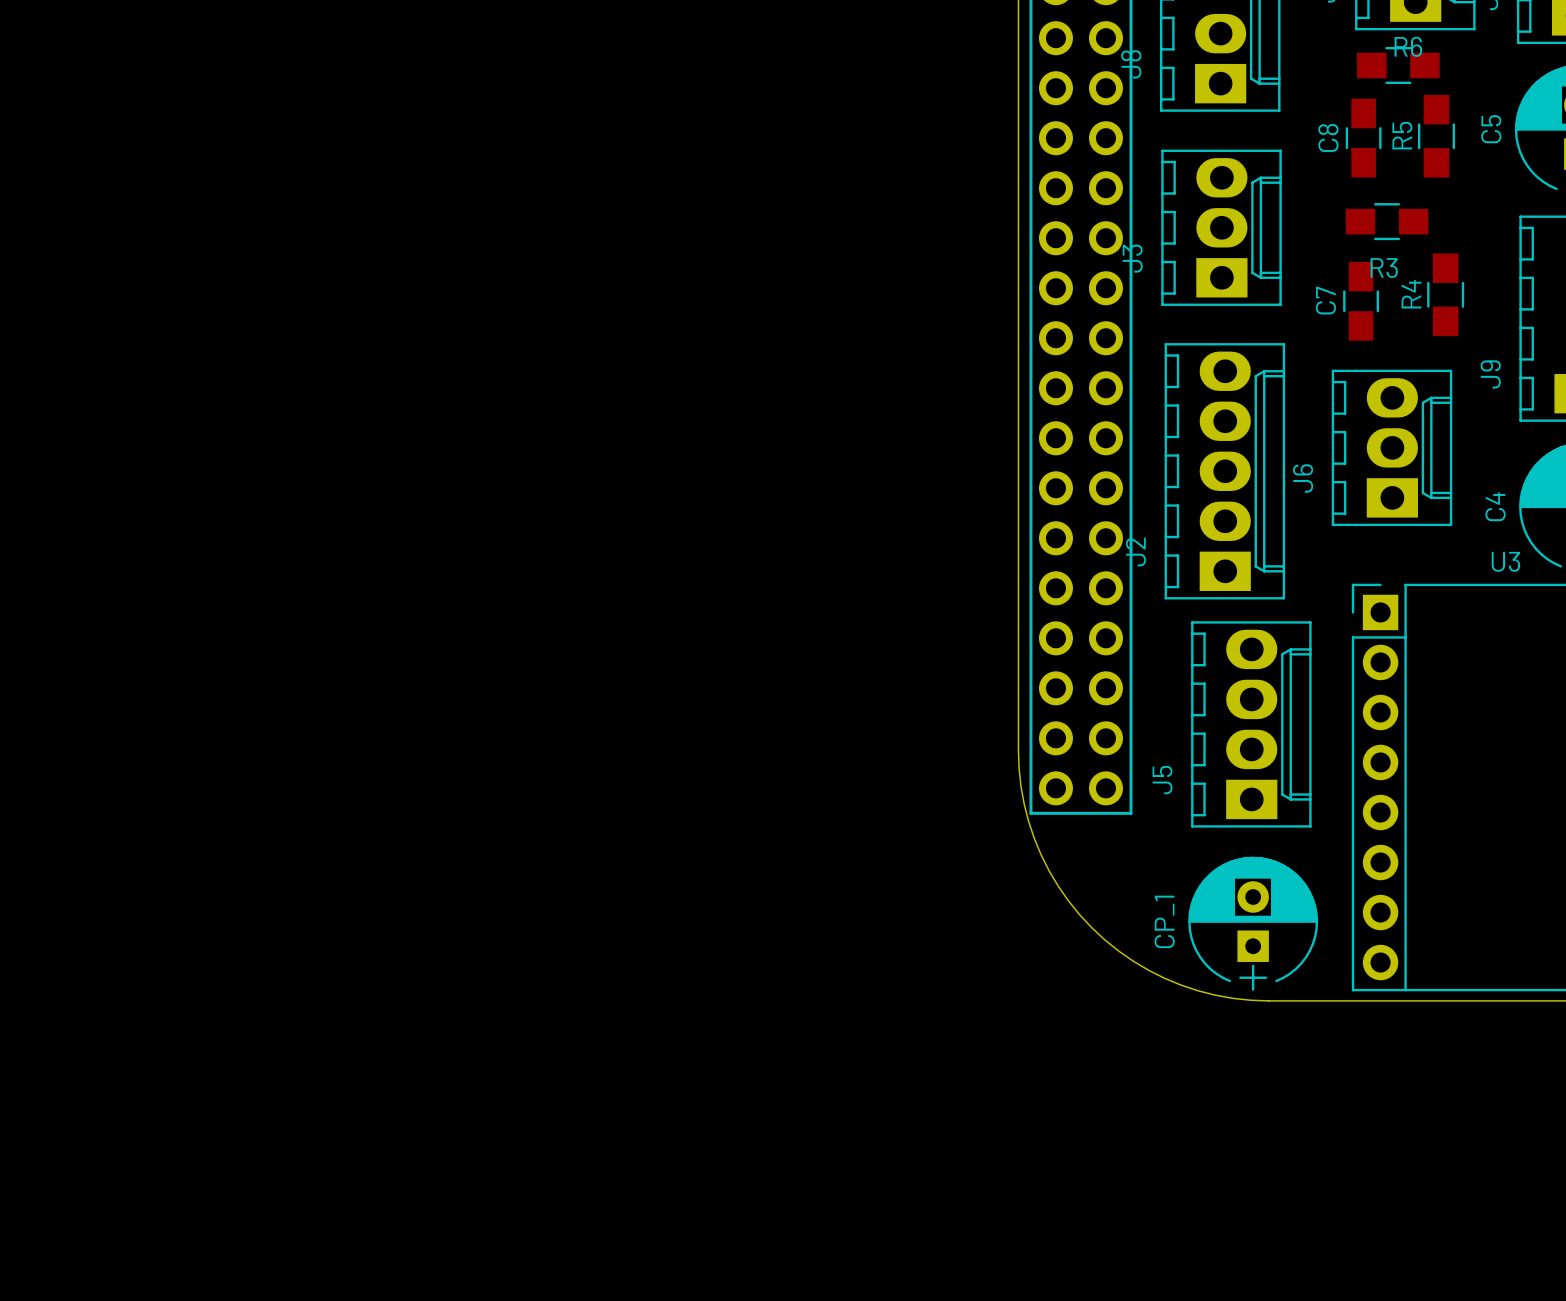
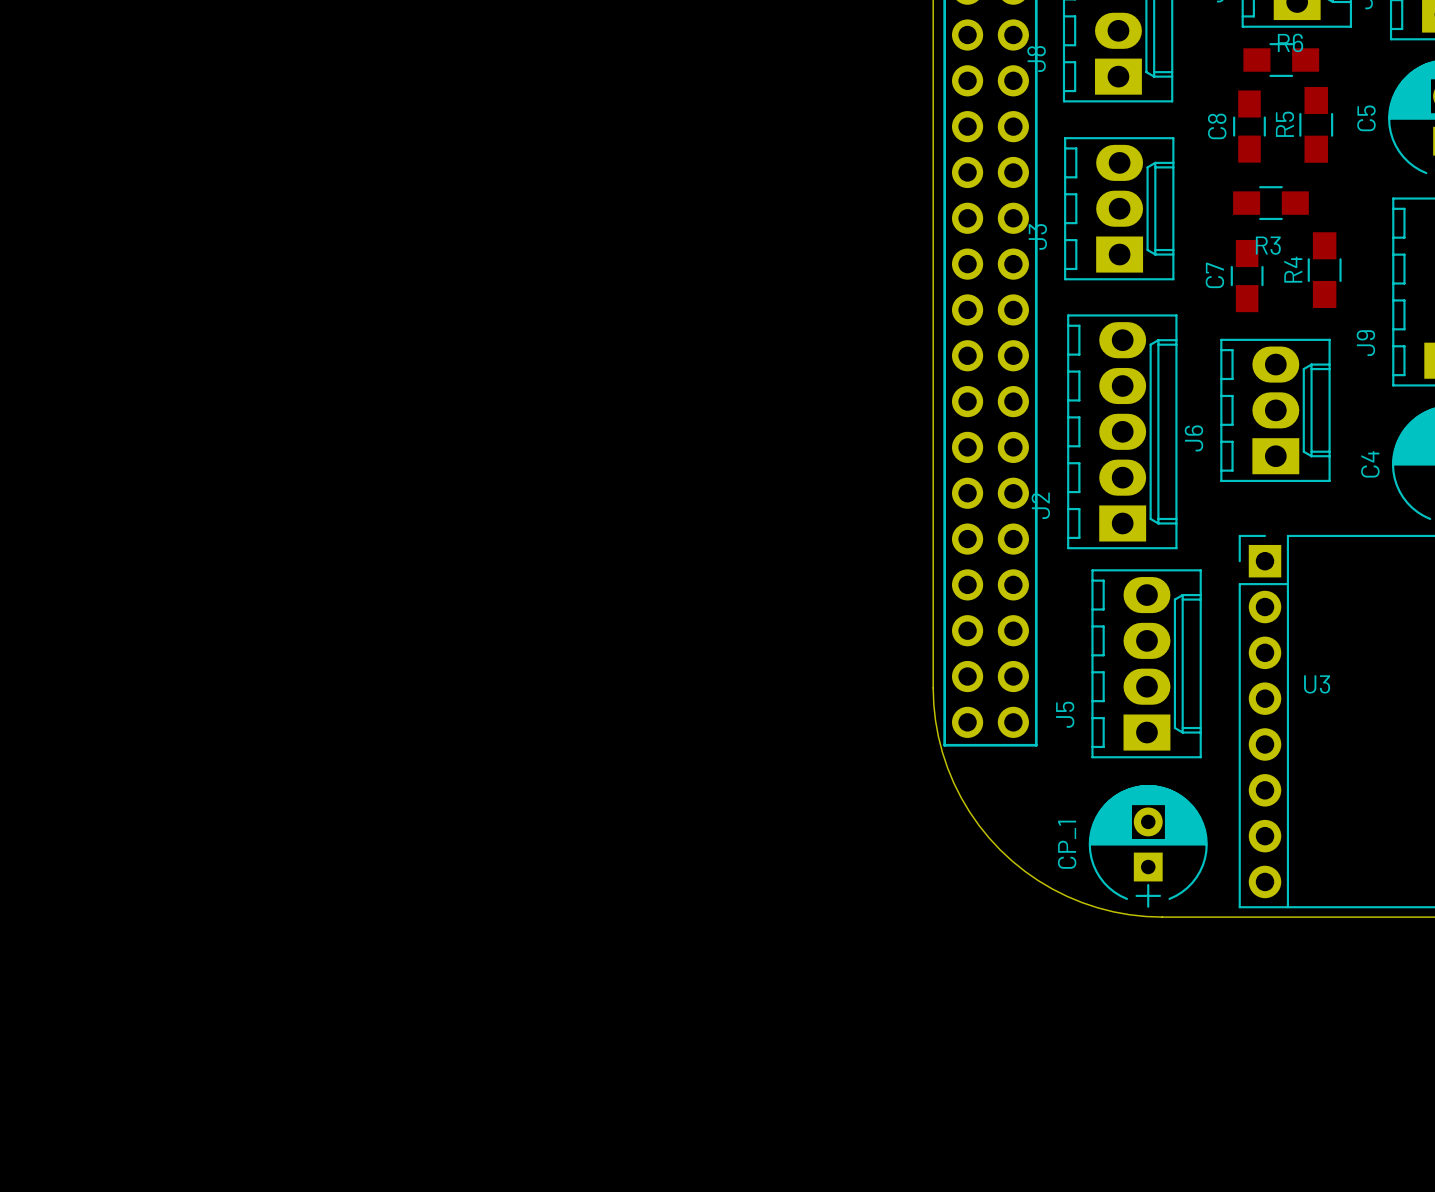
U3 name position: U3 (1505, 561) -> U3 (1317, 684)

